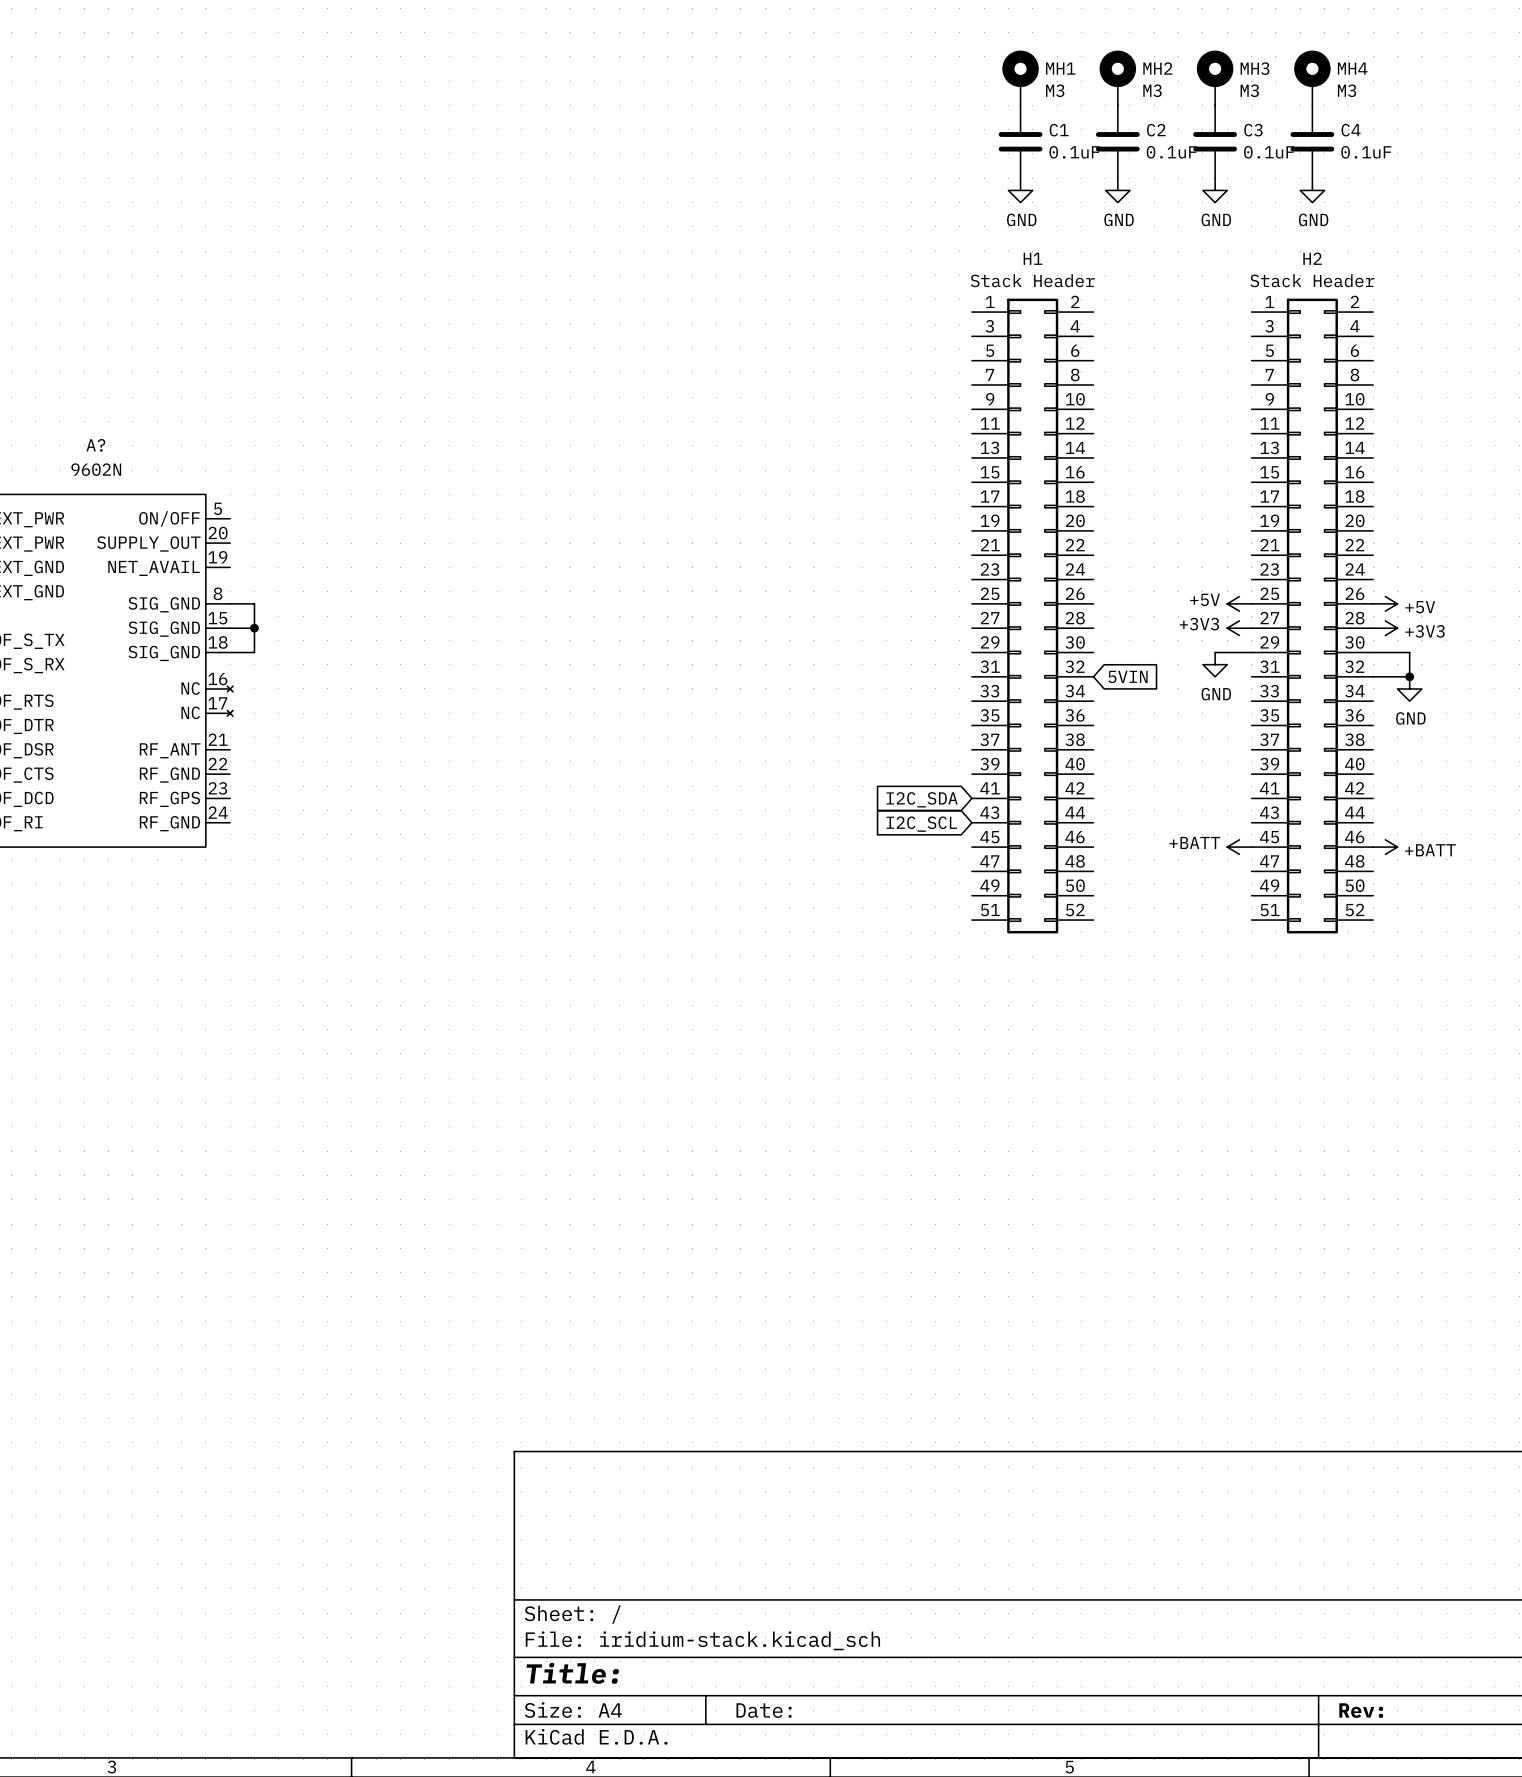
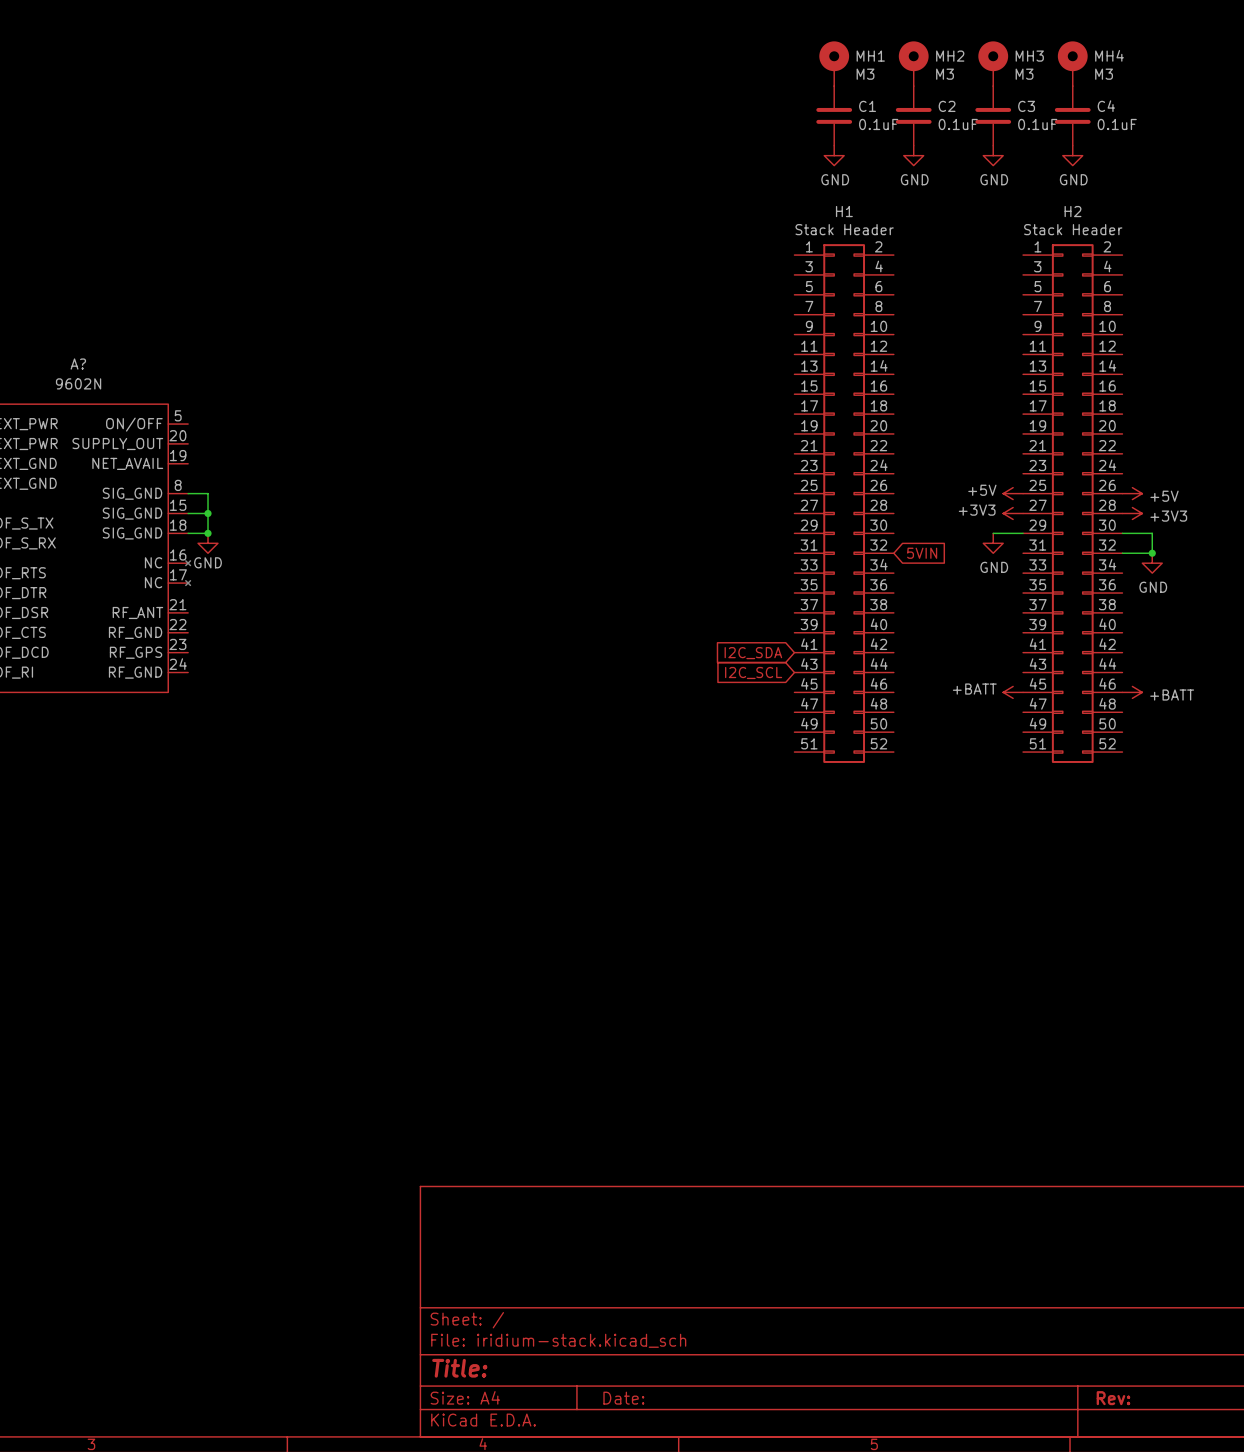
junction: none -> (208, 533)
power symbol: none -> GND (208, 543)

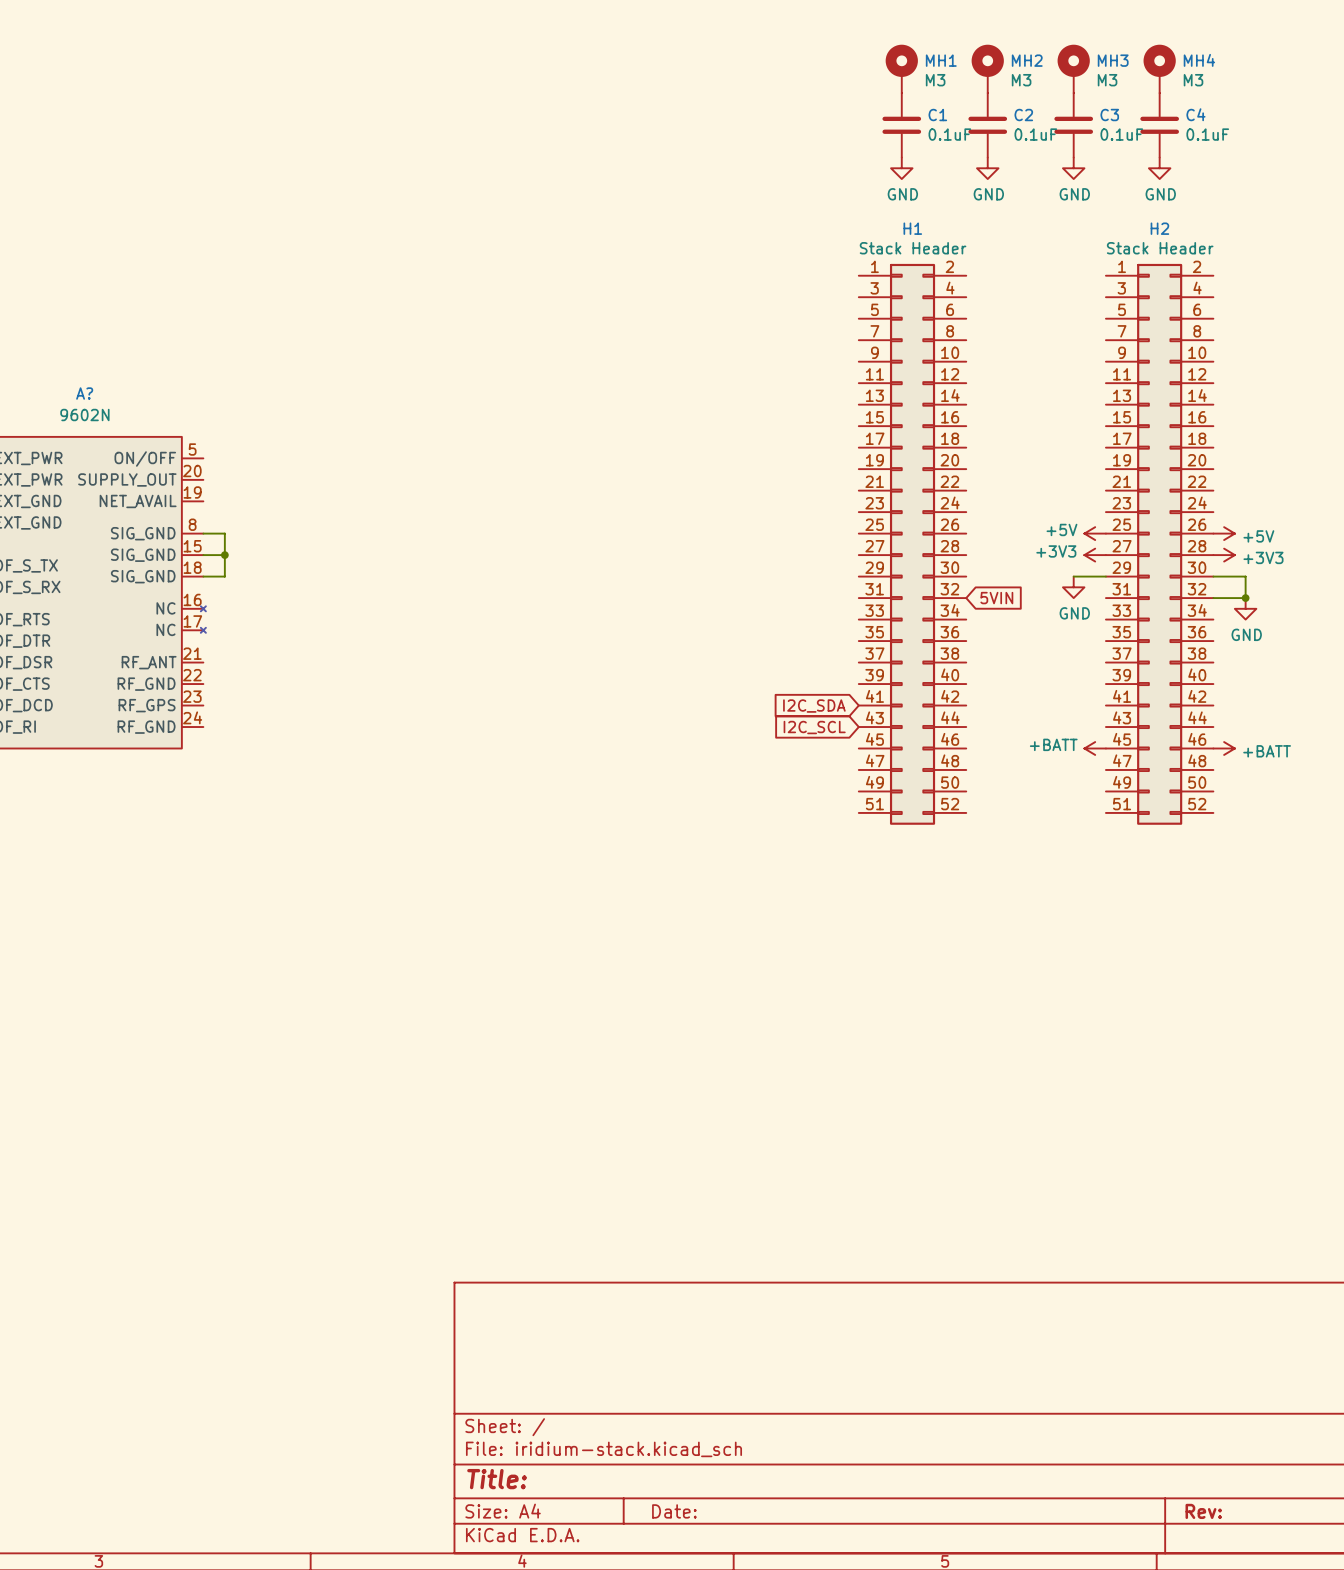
junction: (208, 533) -> none
power symbol: GND (208, 543) -> none

